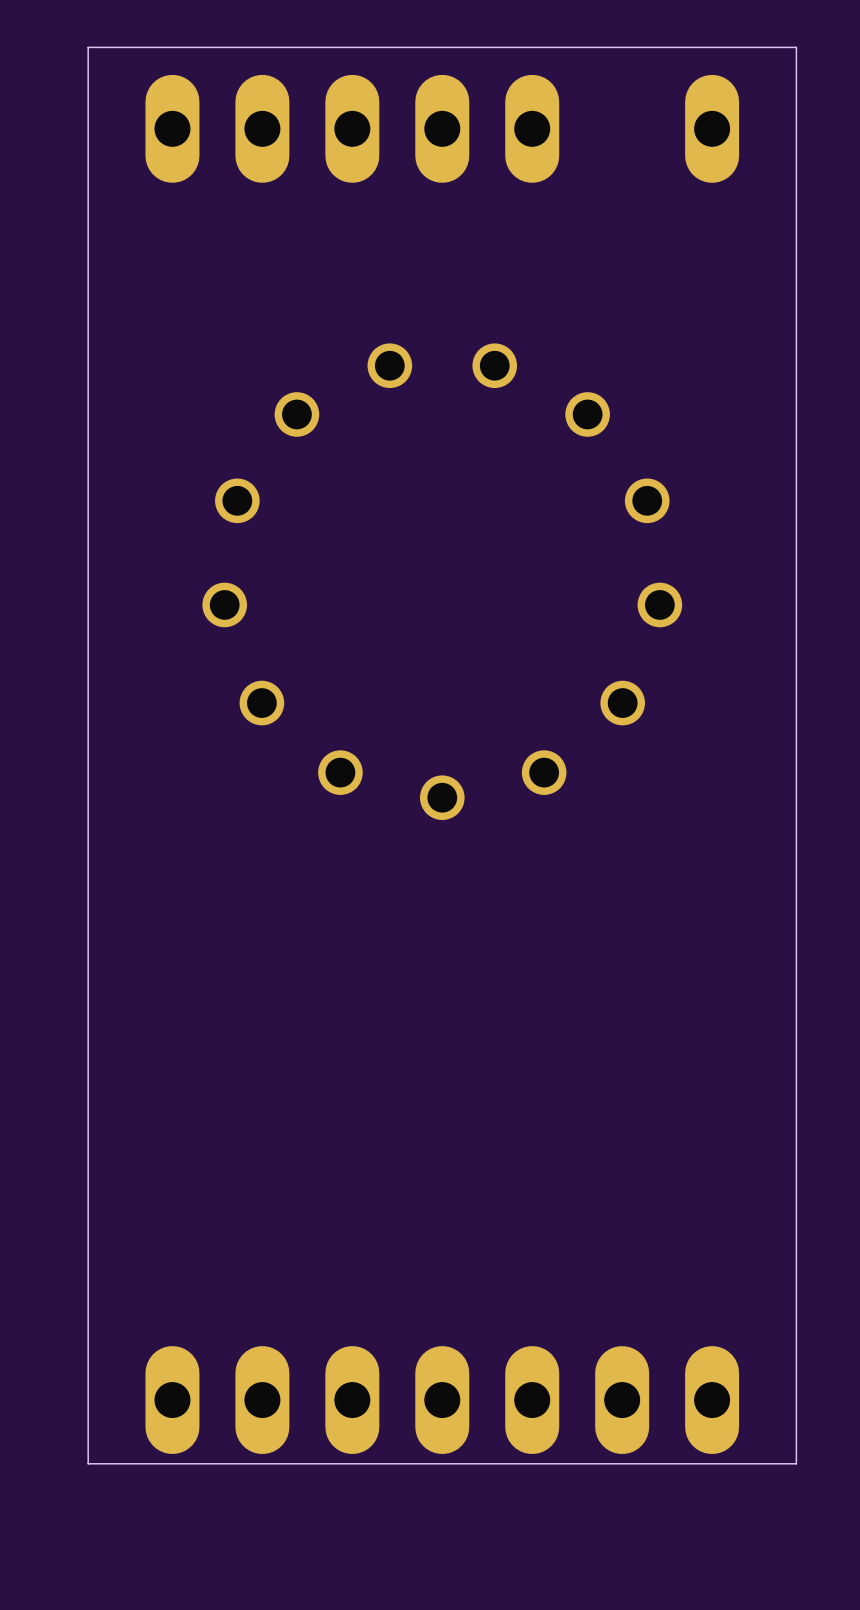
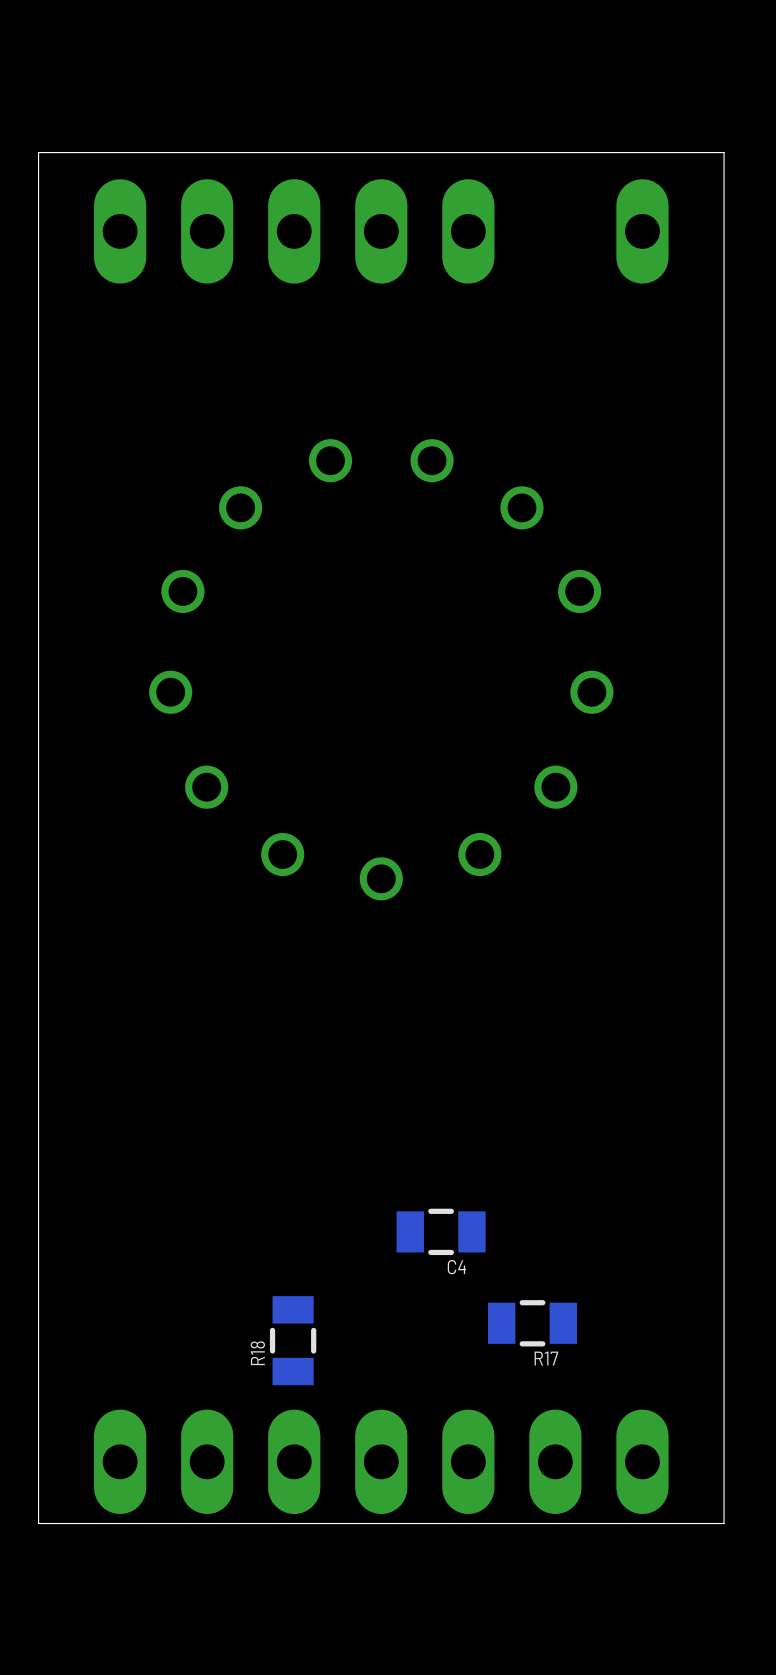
C4: none -> (441, 1231)
R17: none -> (532, 1323)
R18: none -> (293, 1340)

